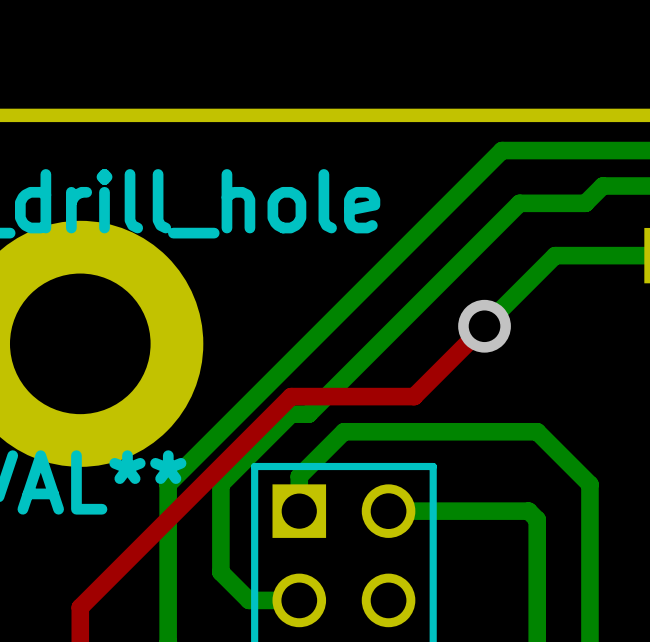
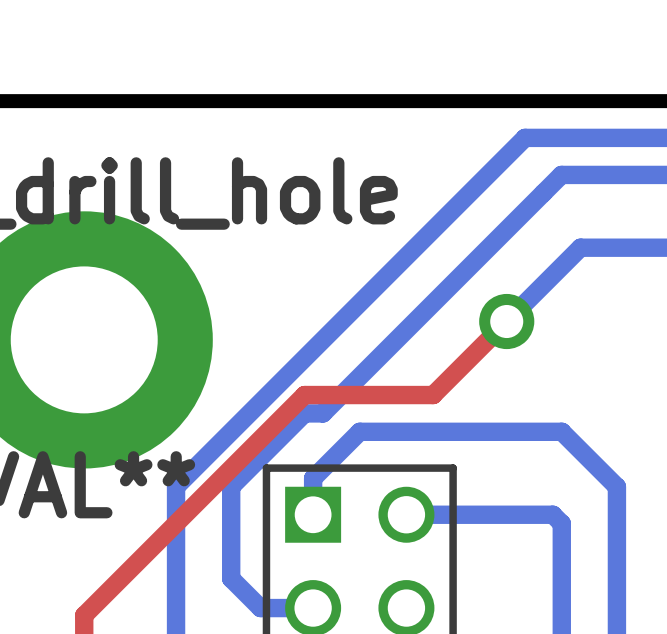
bottom track: (602, 186) (585, 203) (519, 203) -> (630, 174) (561, 174) (543, 193)

